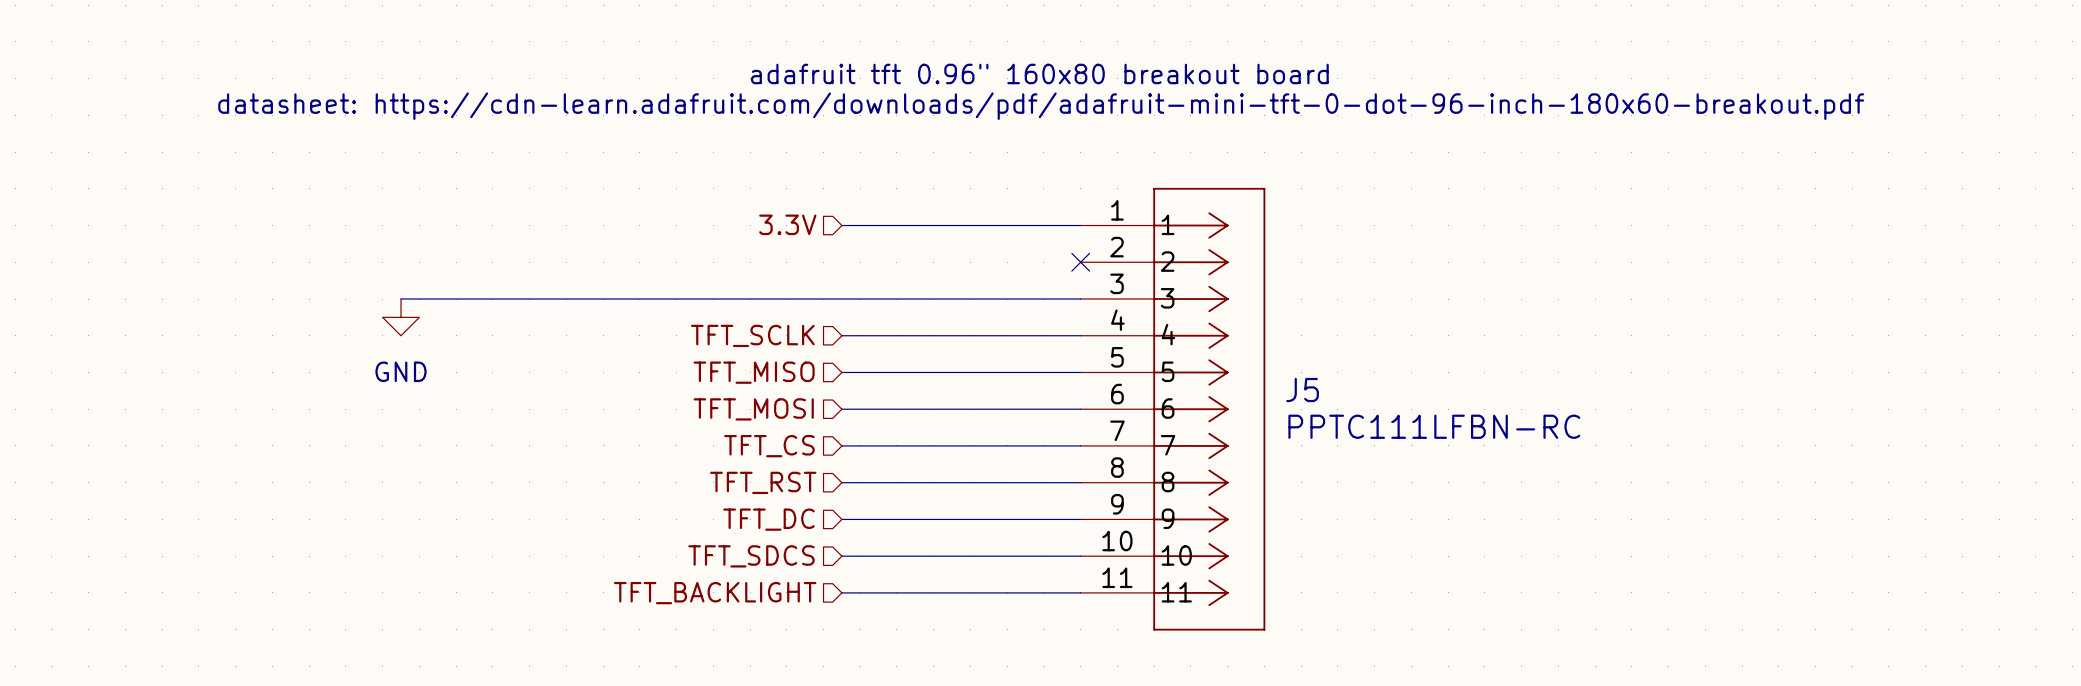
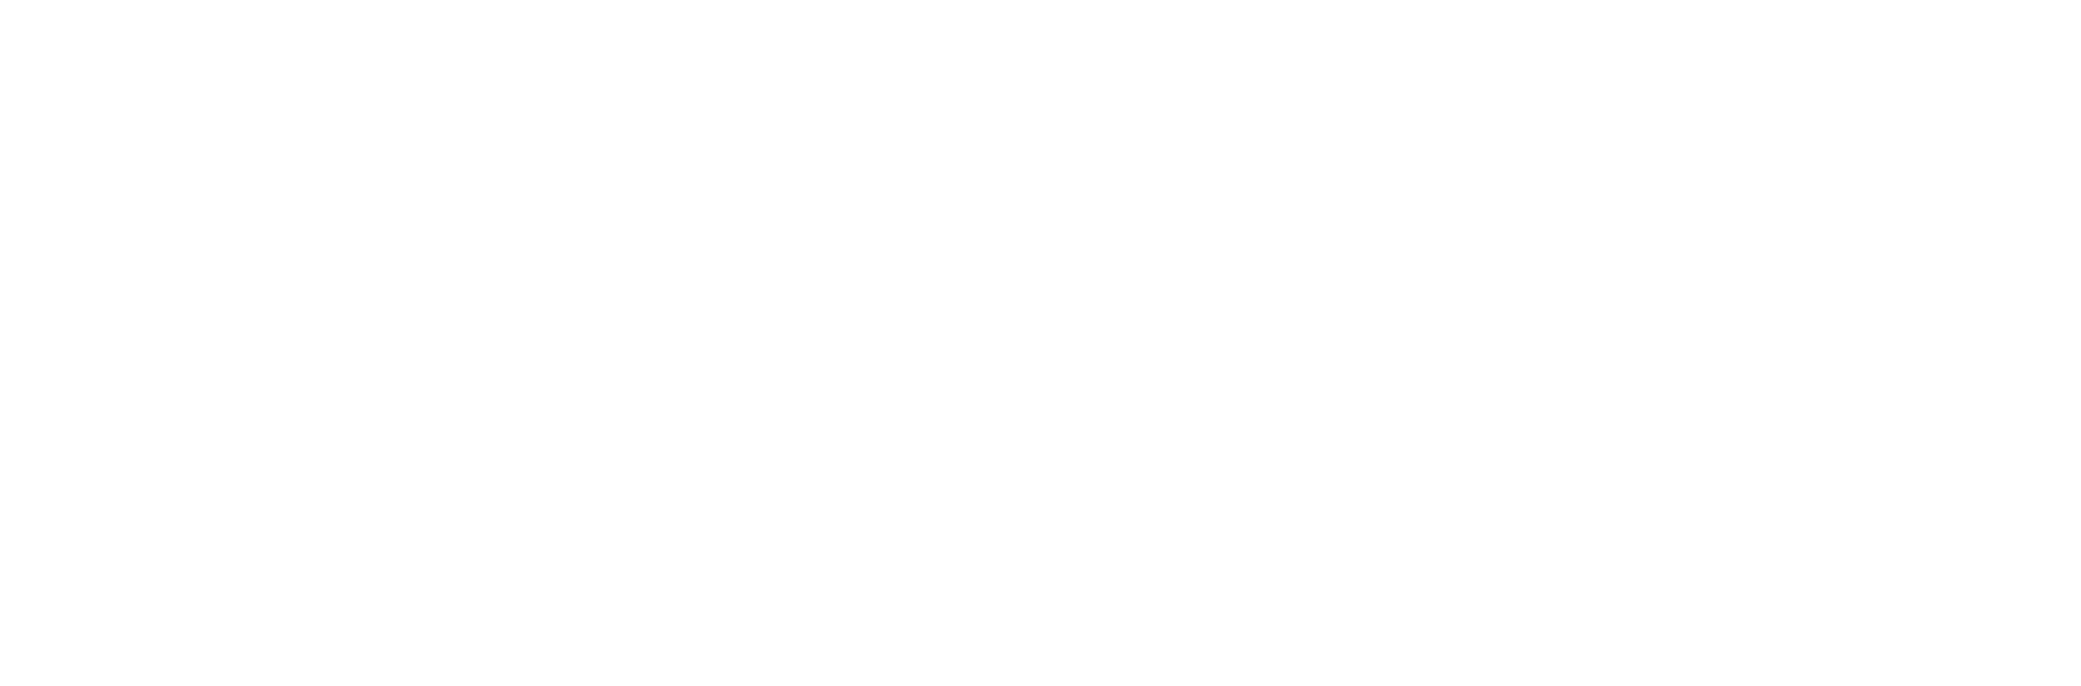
text: adafruit tft 0.96" 160x80 breakout board (1039, 73) -> none
text: datasheet: https://cdn-learn.adafruit.com/downloads/pdf/adafruit-mini-tft-0-dot-96-inch-180x60-breakout.pdf (1041, 106) -> none
hierarchical label: 3.3V (787, 224) -> none
wire: (841, 225) (1080, 225) -> none
no-connect mark: (1080, 262) -> none
wire: (401, 299) (1080, 299) -> none
power symbol: GND (401, 317) -> none
hierarchical label: TFT_SCLK (752, 335) -> none
wire: (841, 335) (1080, 335) -> none
hierarchical label: TFT_MISO (754, 372) -> none
wire: (841, 372) (1080, 372) -> none
hierarchical label: TFT_MOSI (753, 409) -> none
wire: (841, 409) (1080, 409) -> none
J5: PPTC111LFBN-RC (1173, 409) -> none
wire: (841, 445) (1080, 445) -> none
hierarchical label: TFT_CS (769, 446) -> none
hierarchical label: TFT_RST (763, 482) -> none
wire: (841, 482) (1080, 482) -> none
hierarchical label: TFT_DC (768, 519) -> none
wire: (841, 519) (1080, 519) -> none
hierarchical label: TFT_SDCS (751, 556) -> none
wire: (841, 556) (1080, 556) -> none
wire: (841, 592) (1080, 592) -> none
hierarchical label: TFT_BACKLIGHT (715, 593) -> none

